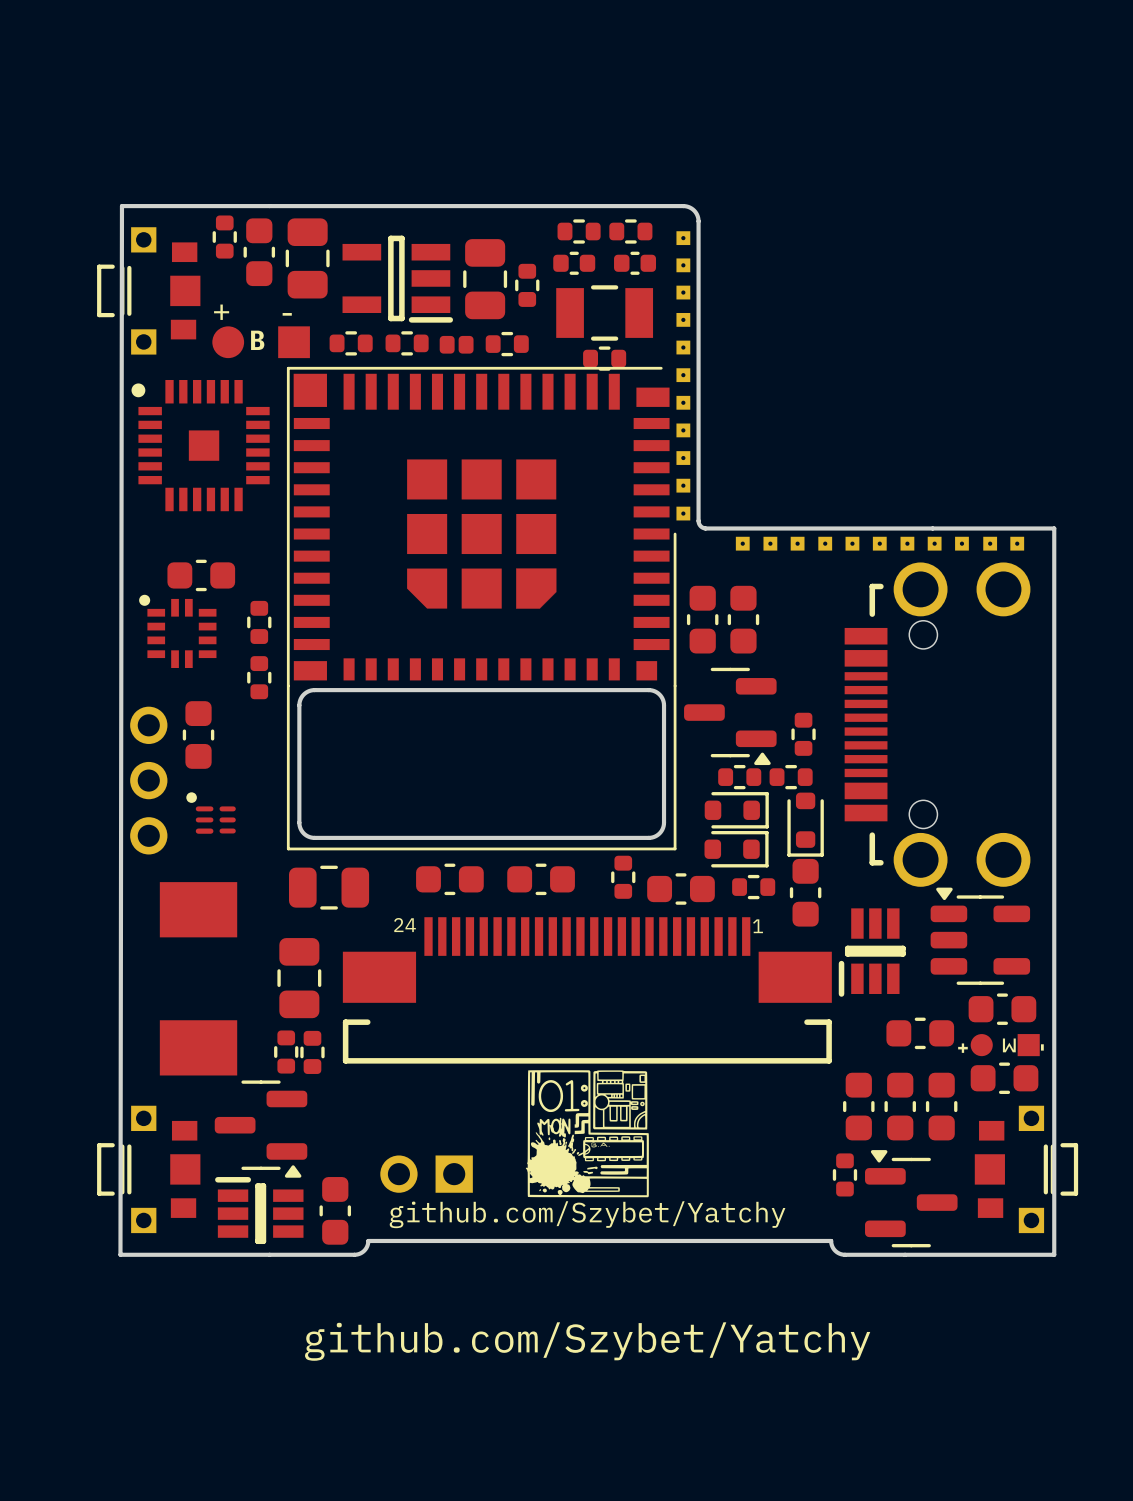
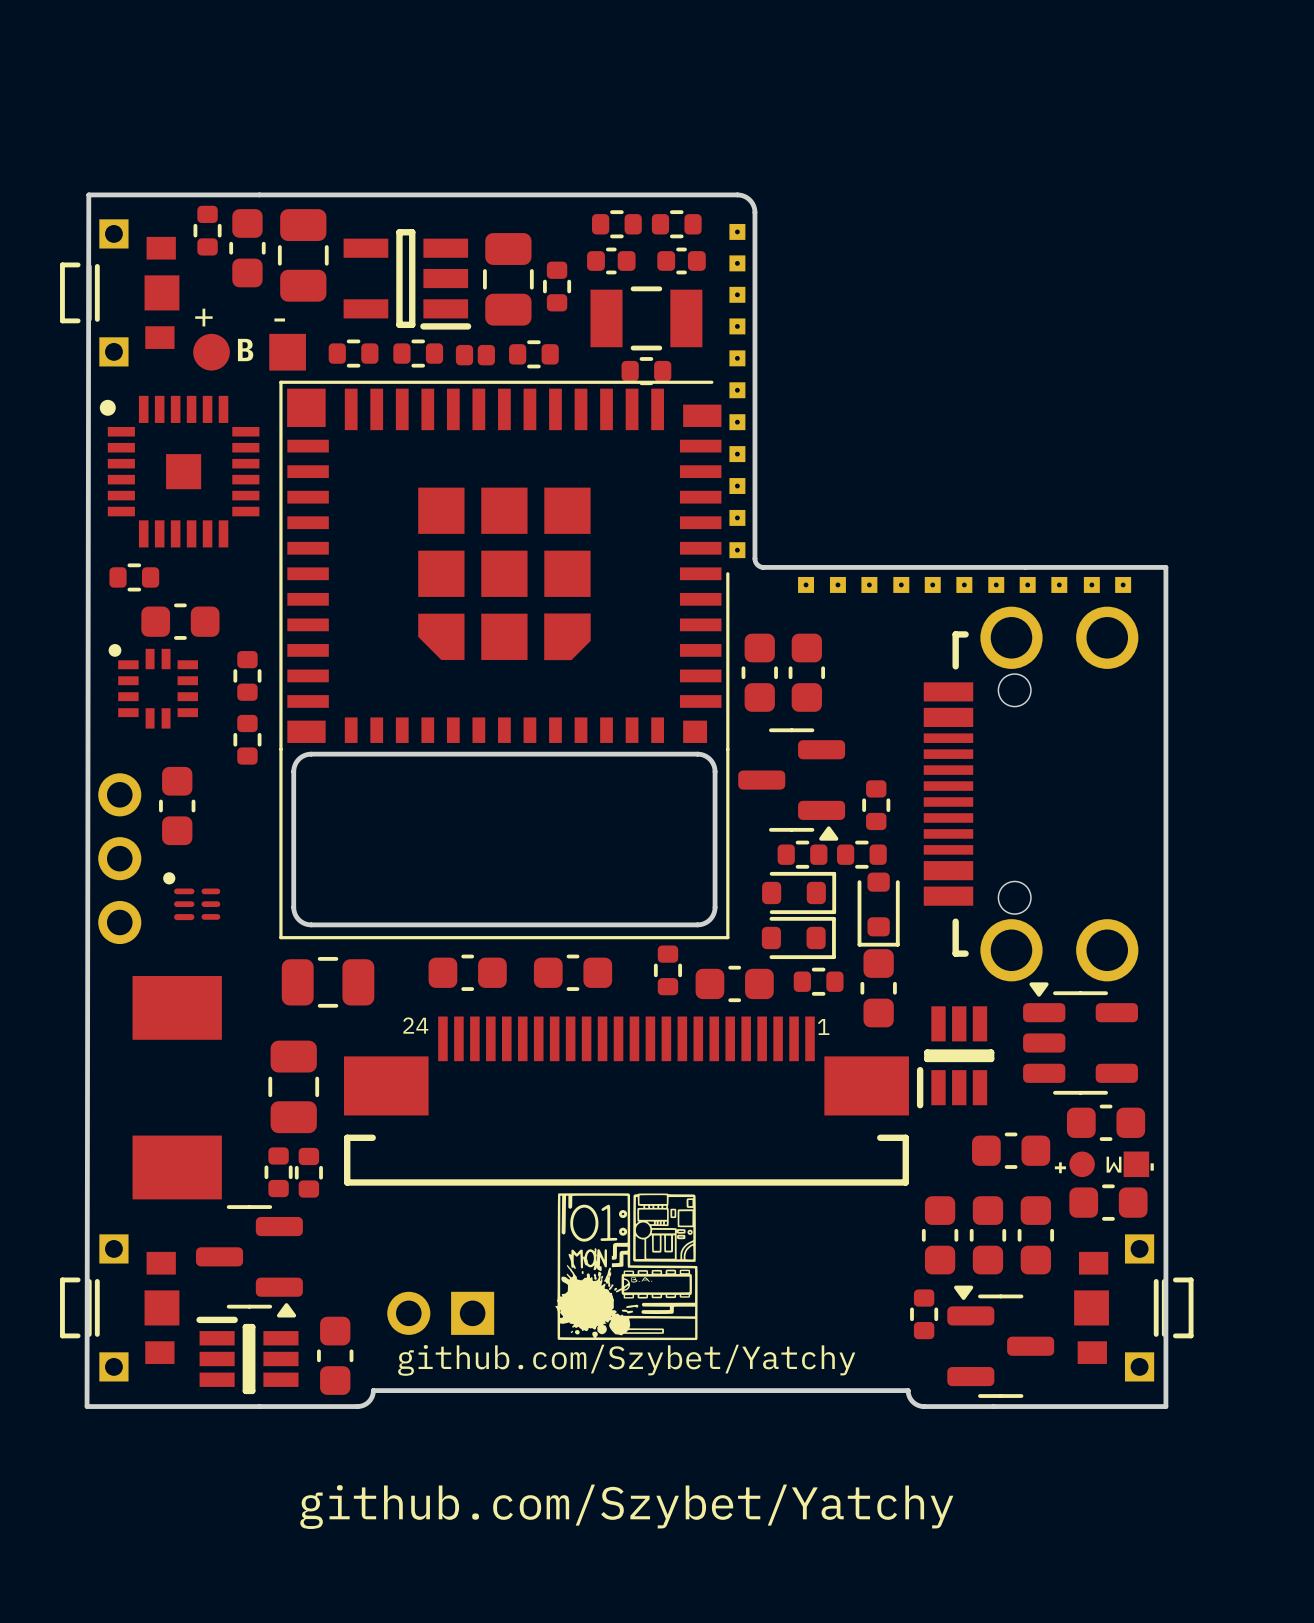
part: none -> (134, 577)

